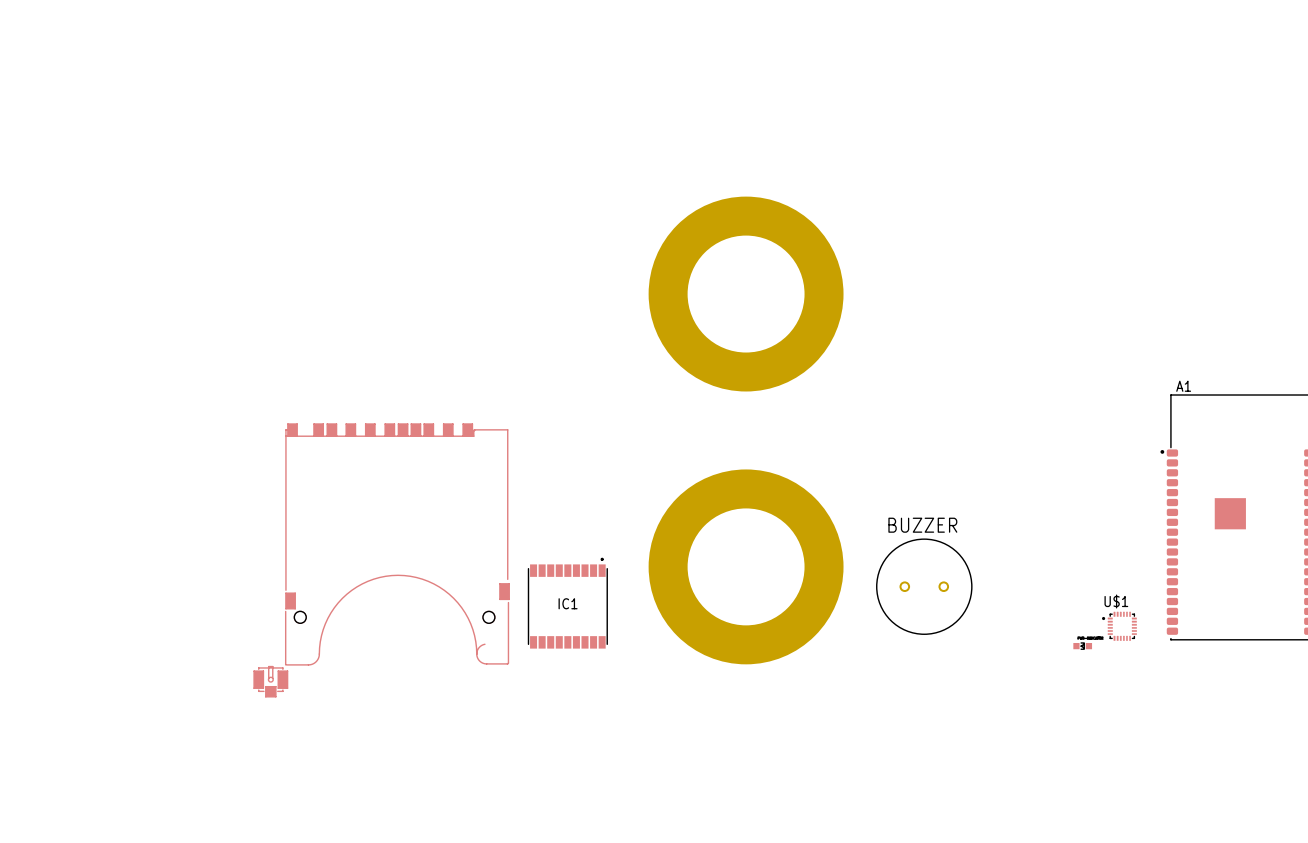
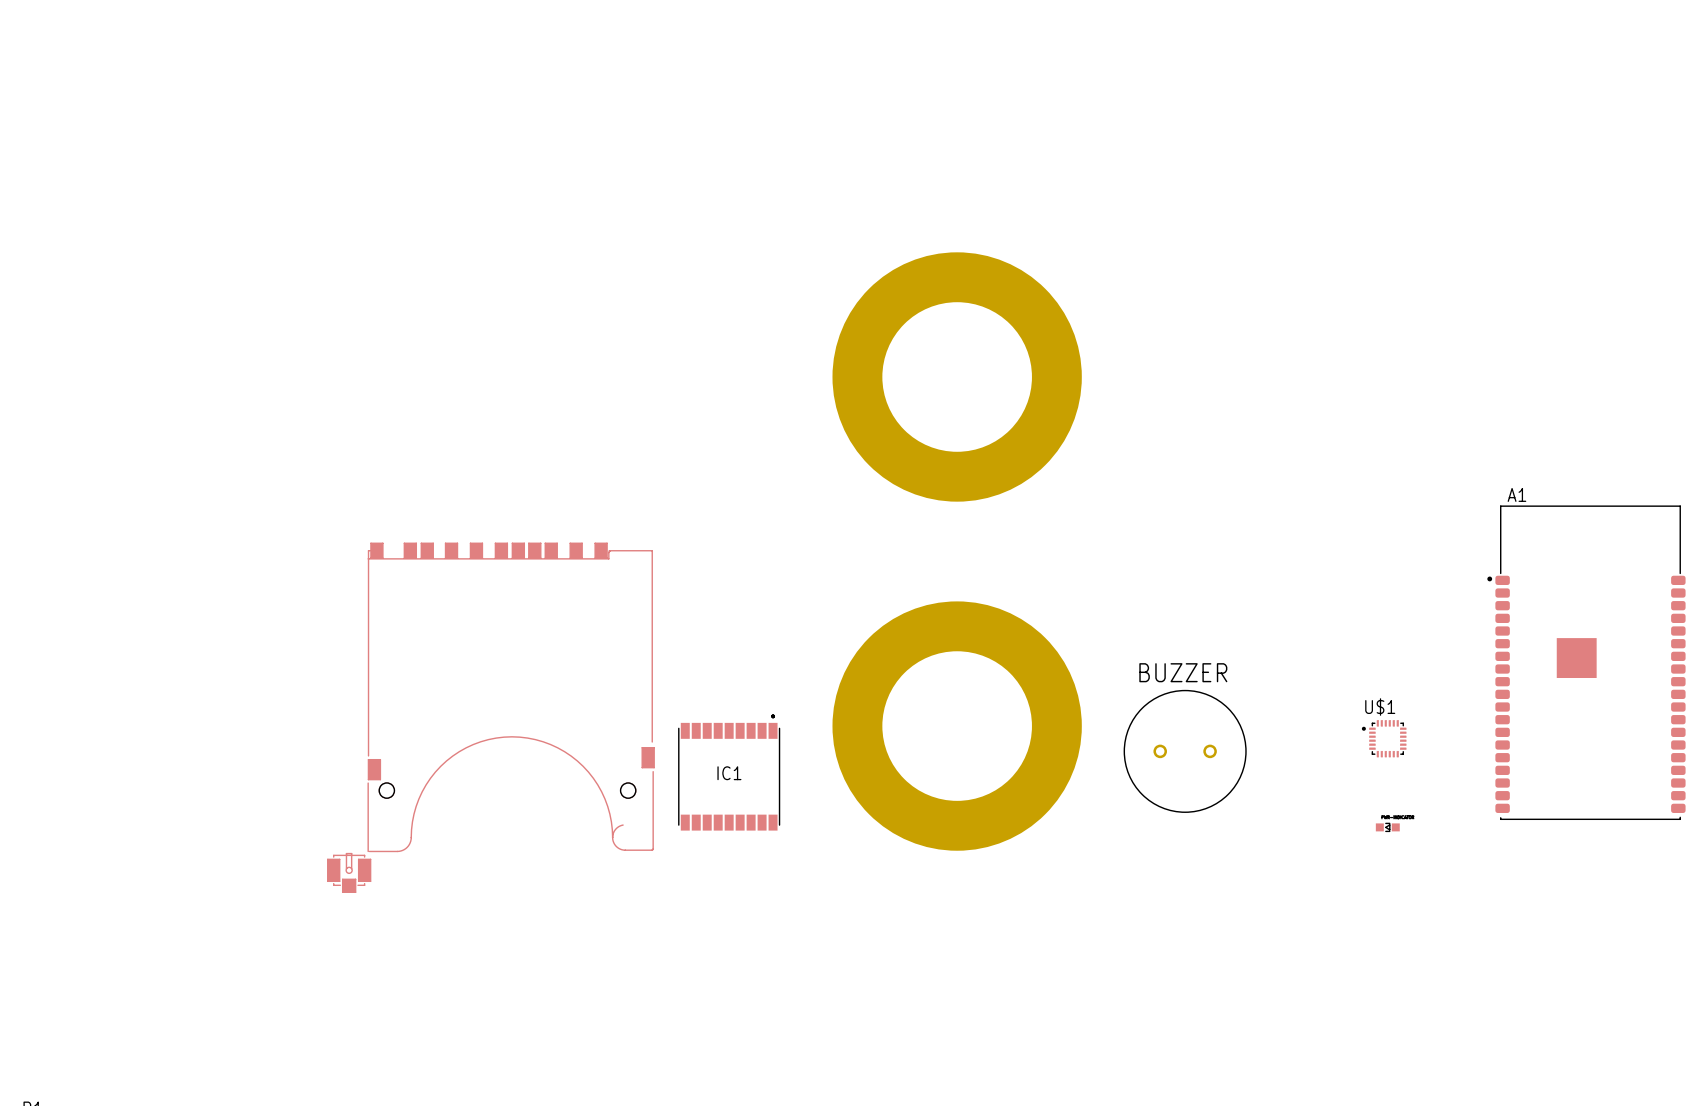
U$1 position: (1119, 626) -> (1384, 738)

